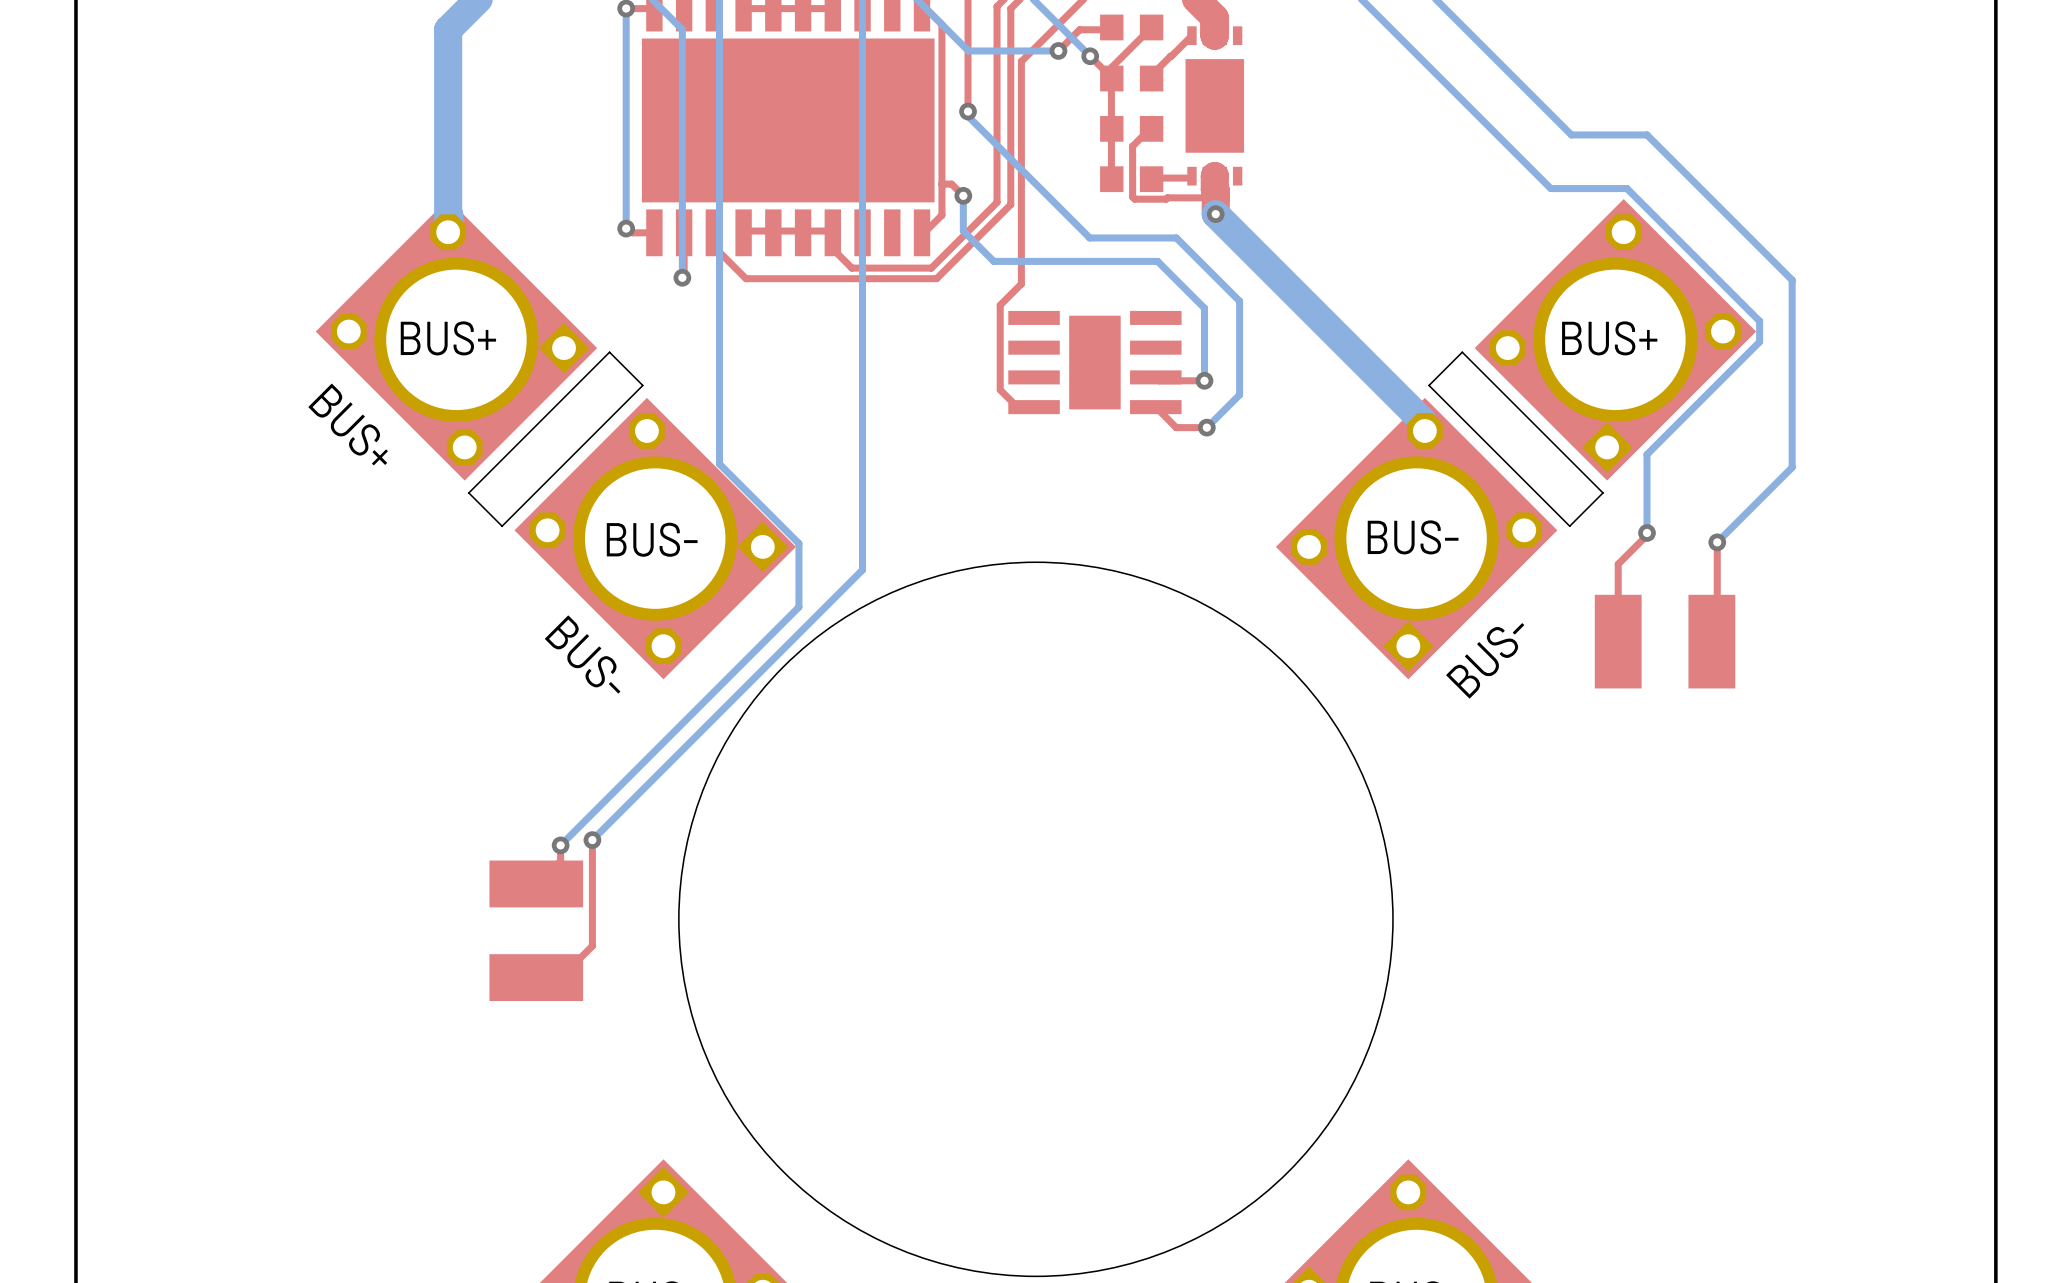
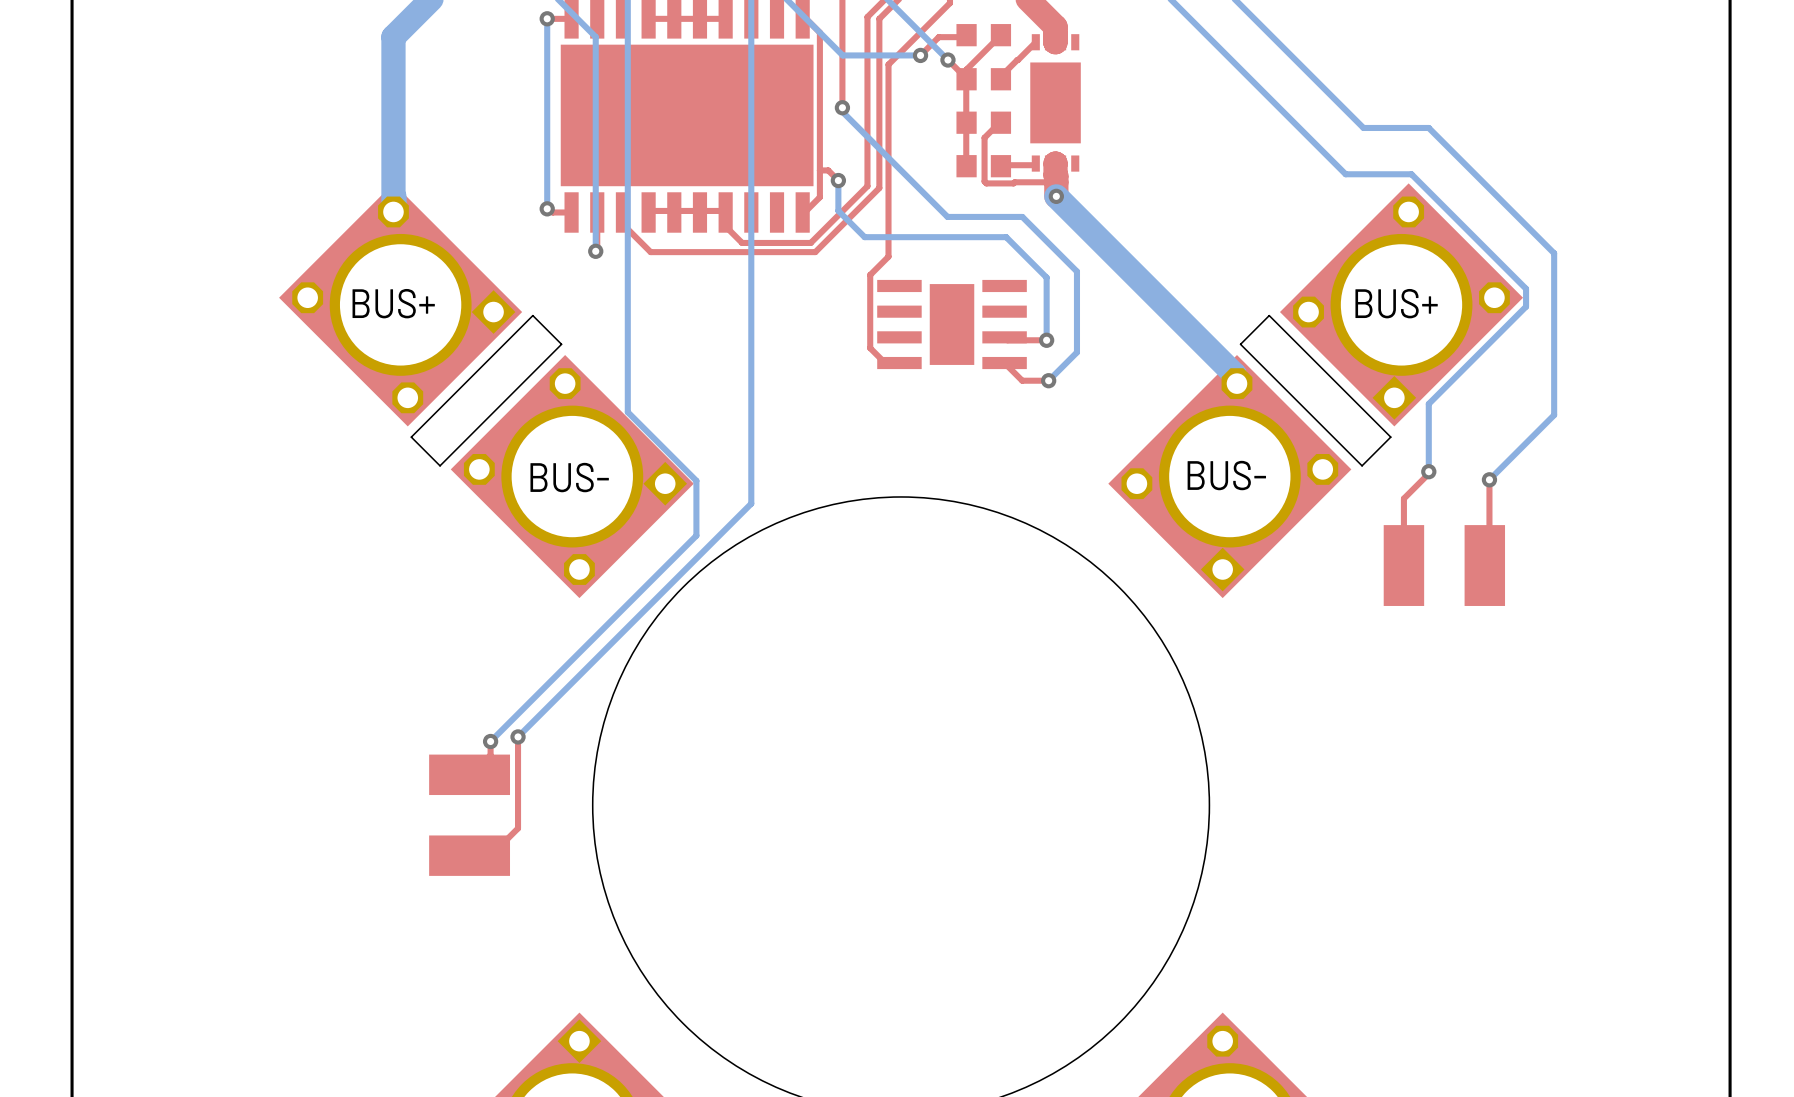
text: BUS+ (348, 424) -> none
text: BUS- (582, 654) -> none
text: BUS- (1485, 660) -> none

